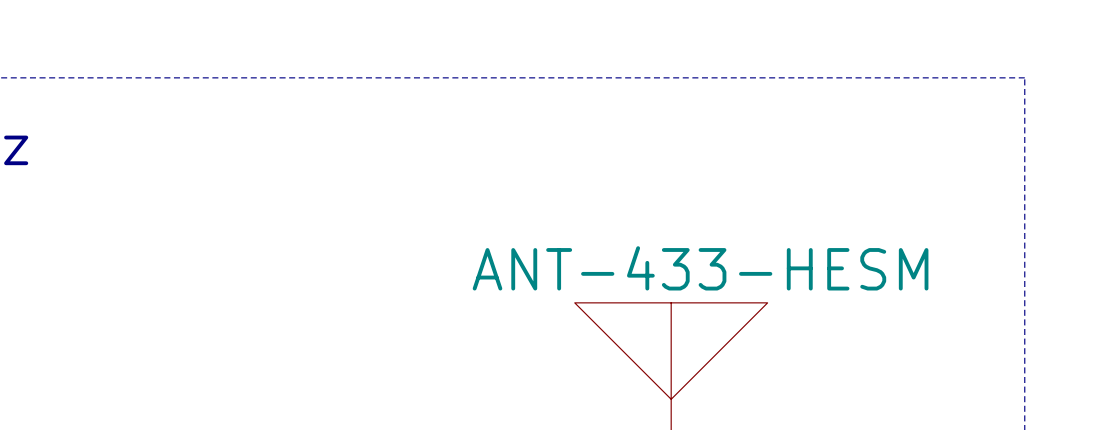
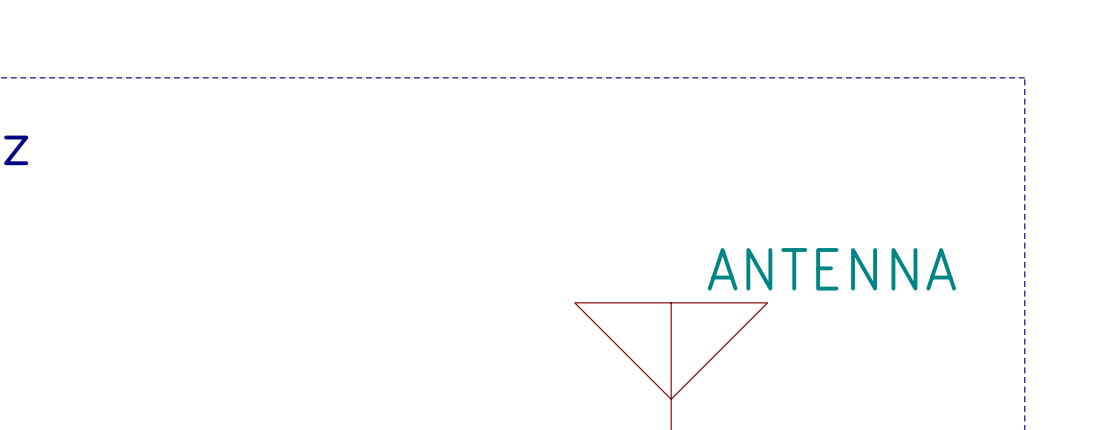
part value: ANT-433-HESM (700, 268) -> ANTENNA (831, 269)

